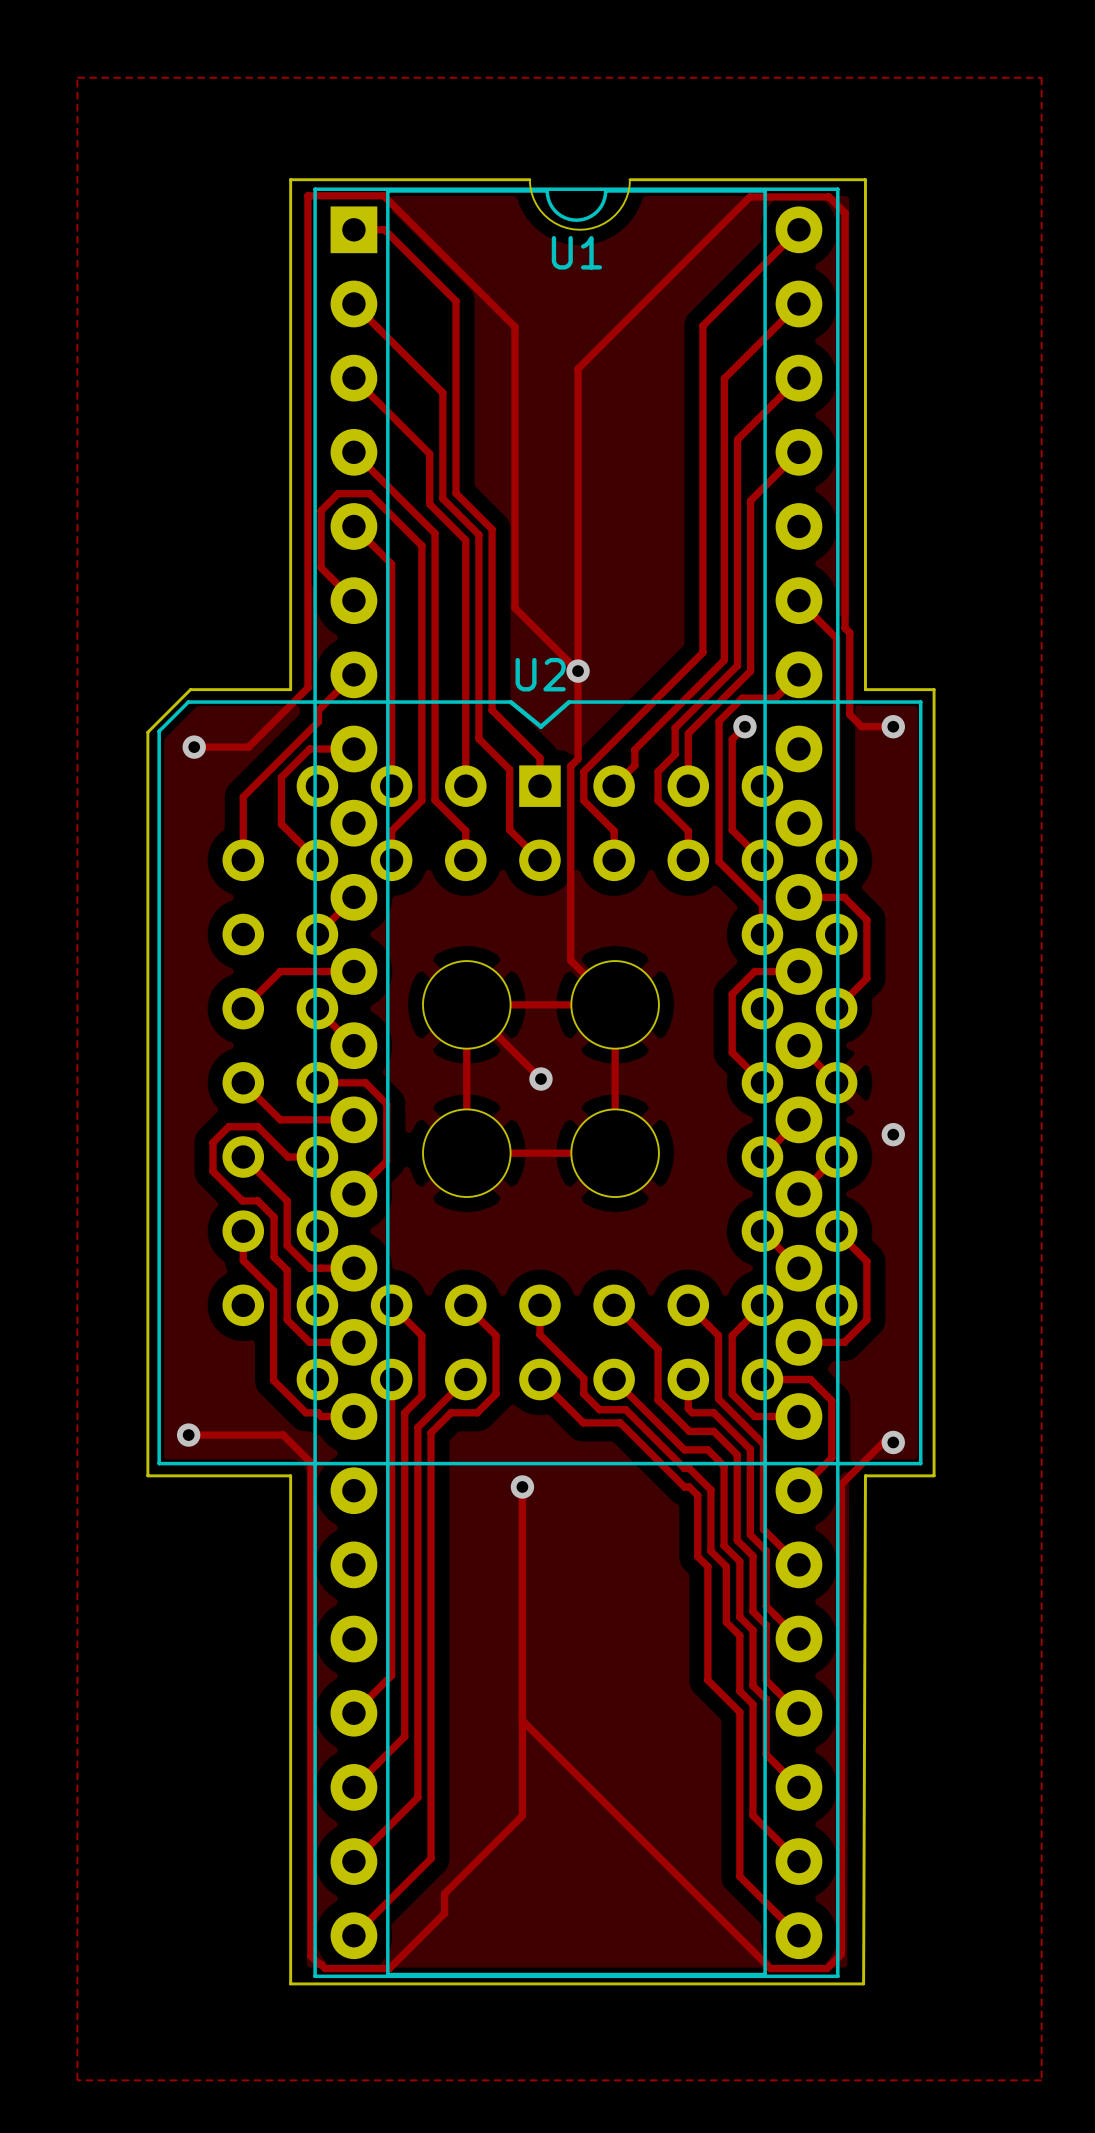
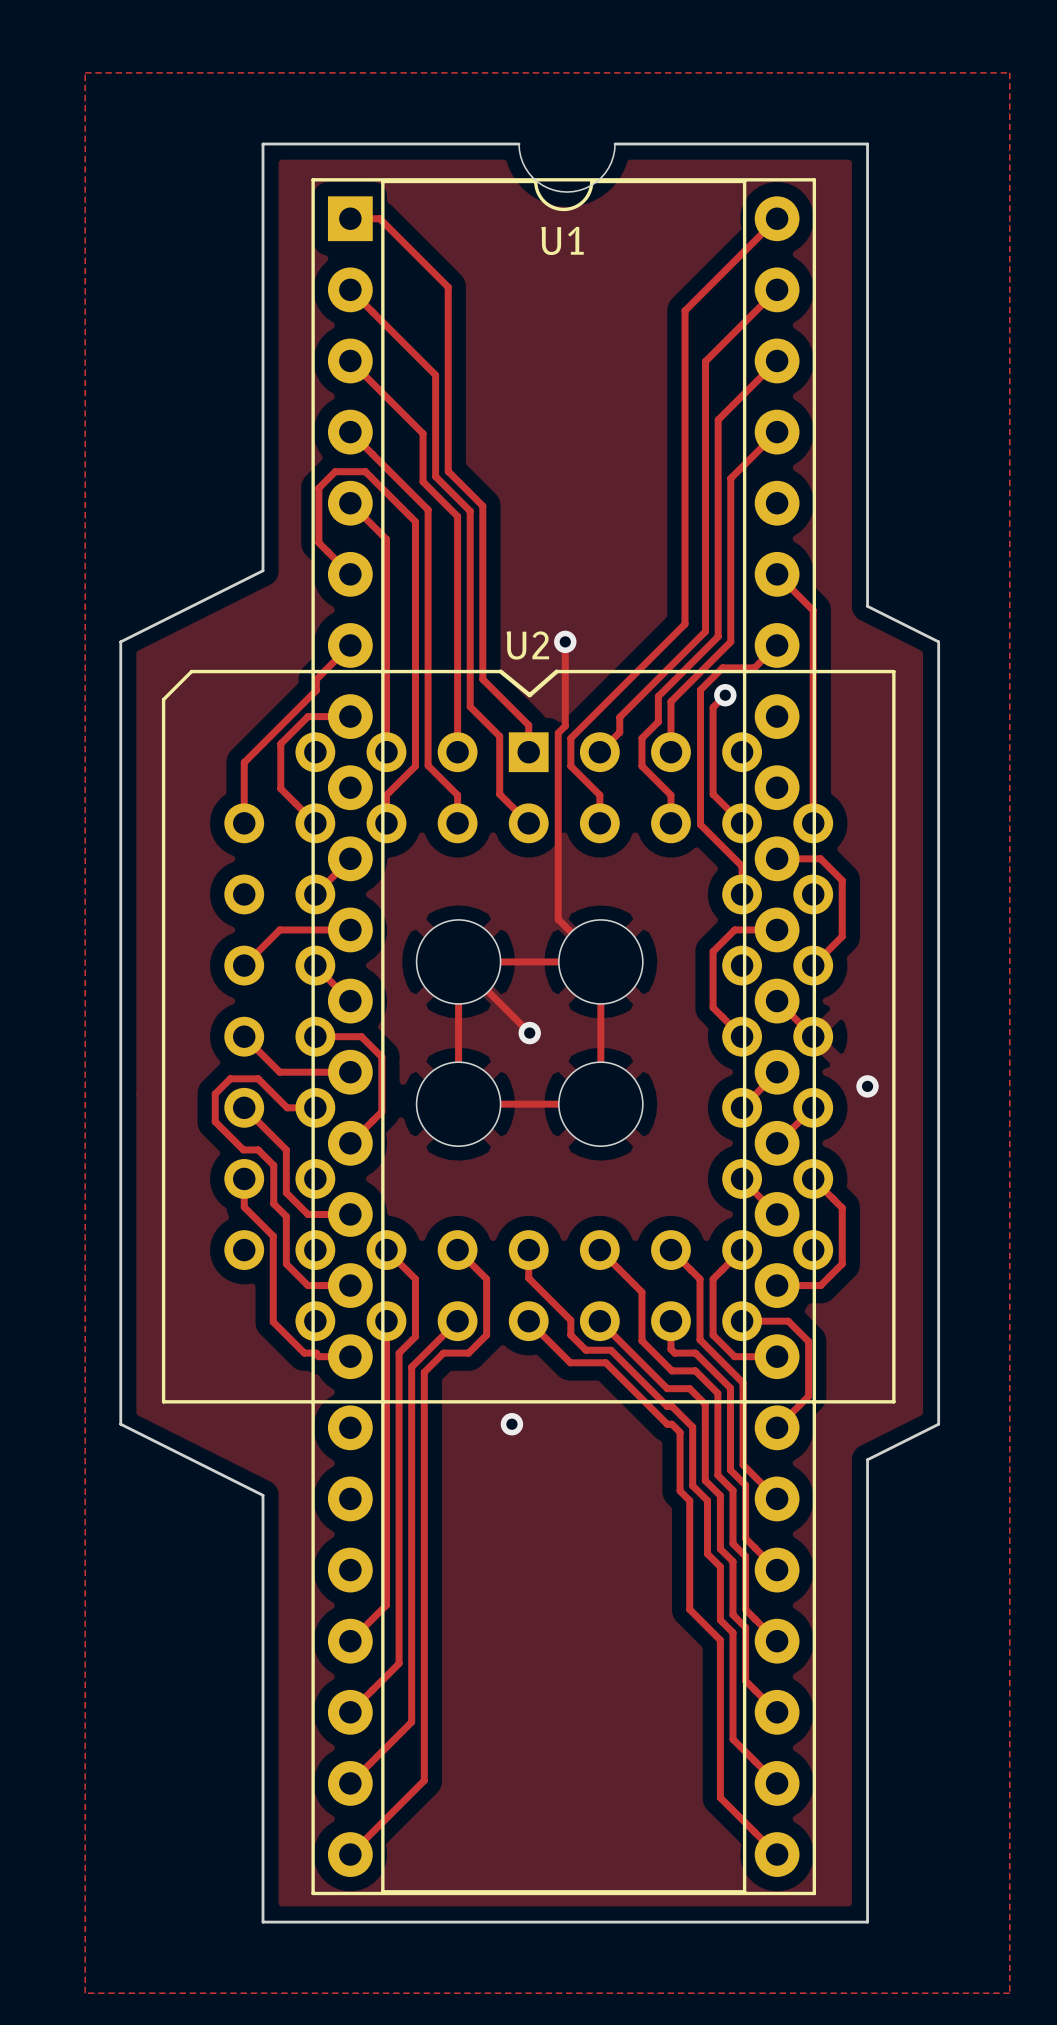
board edge: (290, 179) (529, 179) (533, 198) (544, 215) (560, 225) (579, 229) (599, 225) (615, 215) (626, 198) (629, 179) (865, 179) (865, 689) (934, 689) (934, 1475) (865, 1475) (863, 1983) (290, 1983) (290, 1475) (147, 1475) (147, 732) (190, 689) (290, 689) (290, 179) -> (263, 144) (263, 570) (120, 641) (120, 1424) (263, 1495) (263, 1922) (867, 1922) (867, 1459) (938, 1424) (938, 641) (867, 606) (867, 144) (615, 144) (611, 162) (601, 177) (585, 188) (567, 192) (548, 188) (533, 177) (522, 162) (519, 144) (263, 144)
track: (893, 726) (861, 726) (849, 714) (849, 632) (845, 628) (845, 213) (828, 196) (749, 196) (578, 368) (578, 671) (515, 608) (515, 327) (383, 195) (307, 195) (307, 687) (248, 747) (194, 747) -> none
via: (893, 726) -> none
via: (194, 747) -> none
track: (188, 1435) (283, 1435) (311, 1462) (311, 1956) (325, 1968) (389, 1968) (444, 1913) (444, 1893) (522, 1815) (522, 1486) -> none
via: (188, 1435) -> none
track: (893, 1442) (883, 1442) (841, 1484) (841, 1954) (827, 1968) (770, 1968) (522, 1720) -> none
via: (893, 1442) -> none

